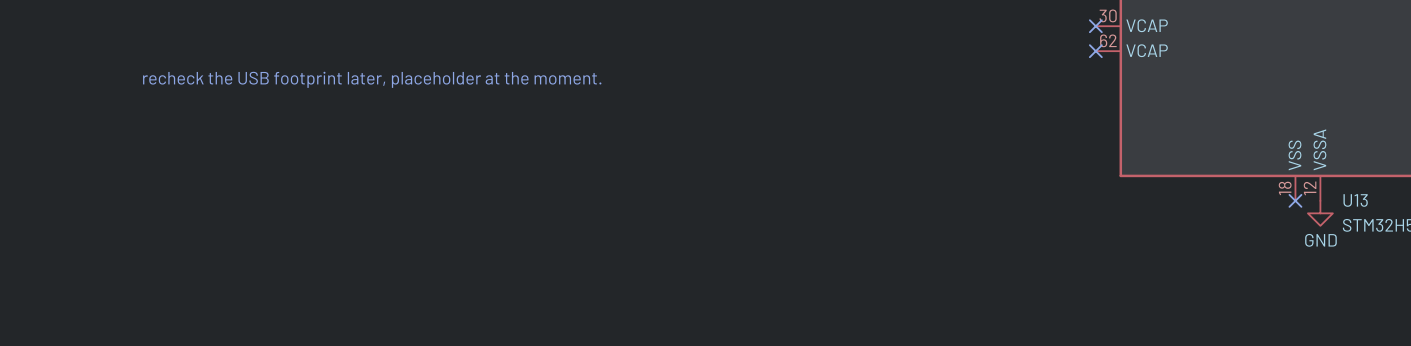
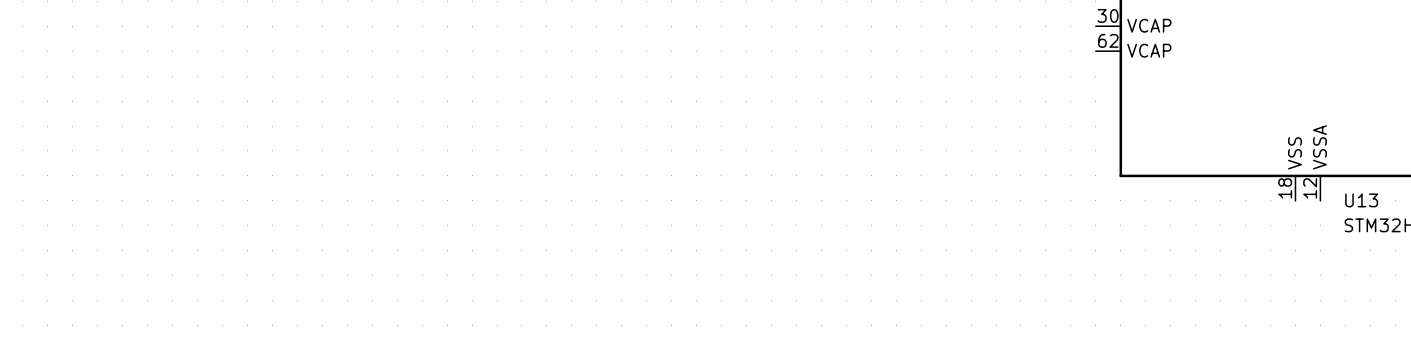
no-connect mark: (1095, 26) -> none
no-connect mark: (1095, 51) -> none
text: recheck the USB footprint later, placeholder at the moment. (372, 79) -> none
no-connect mark: (1295, 200) -> none
power symbol: GND (1320, 213) -> none

